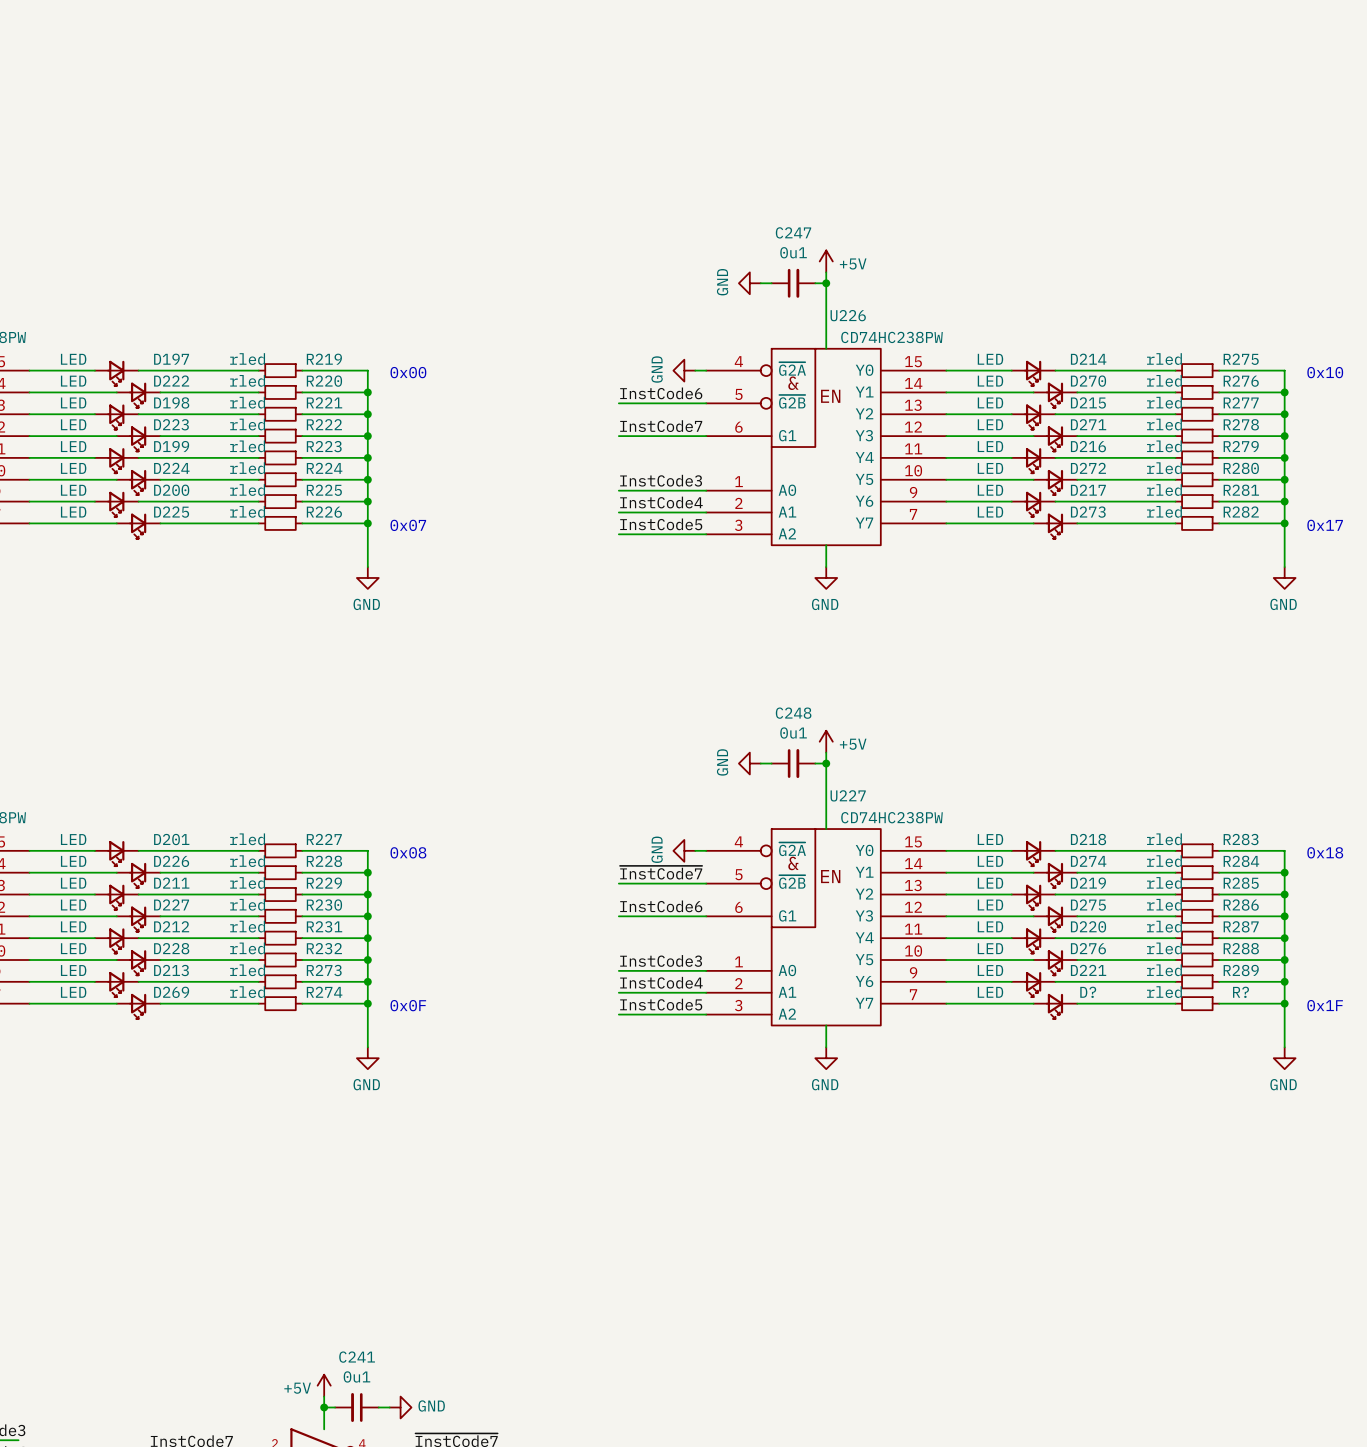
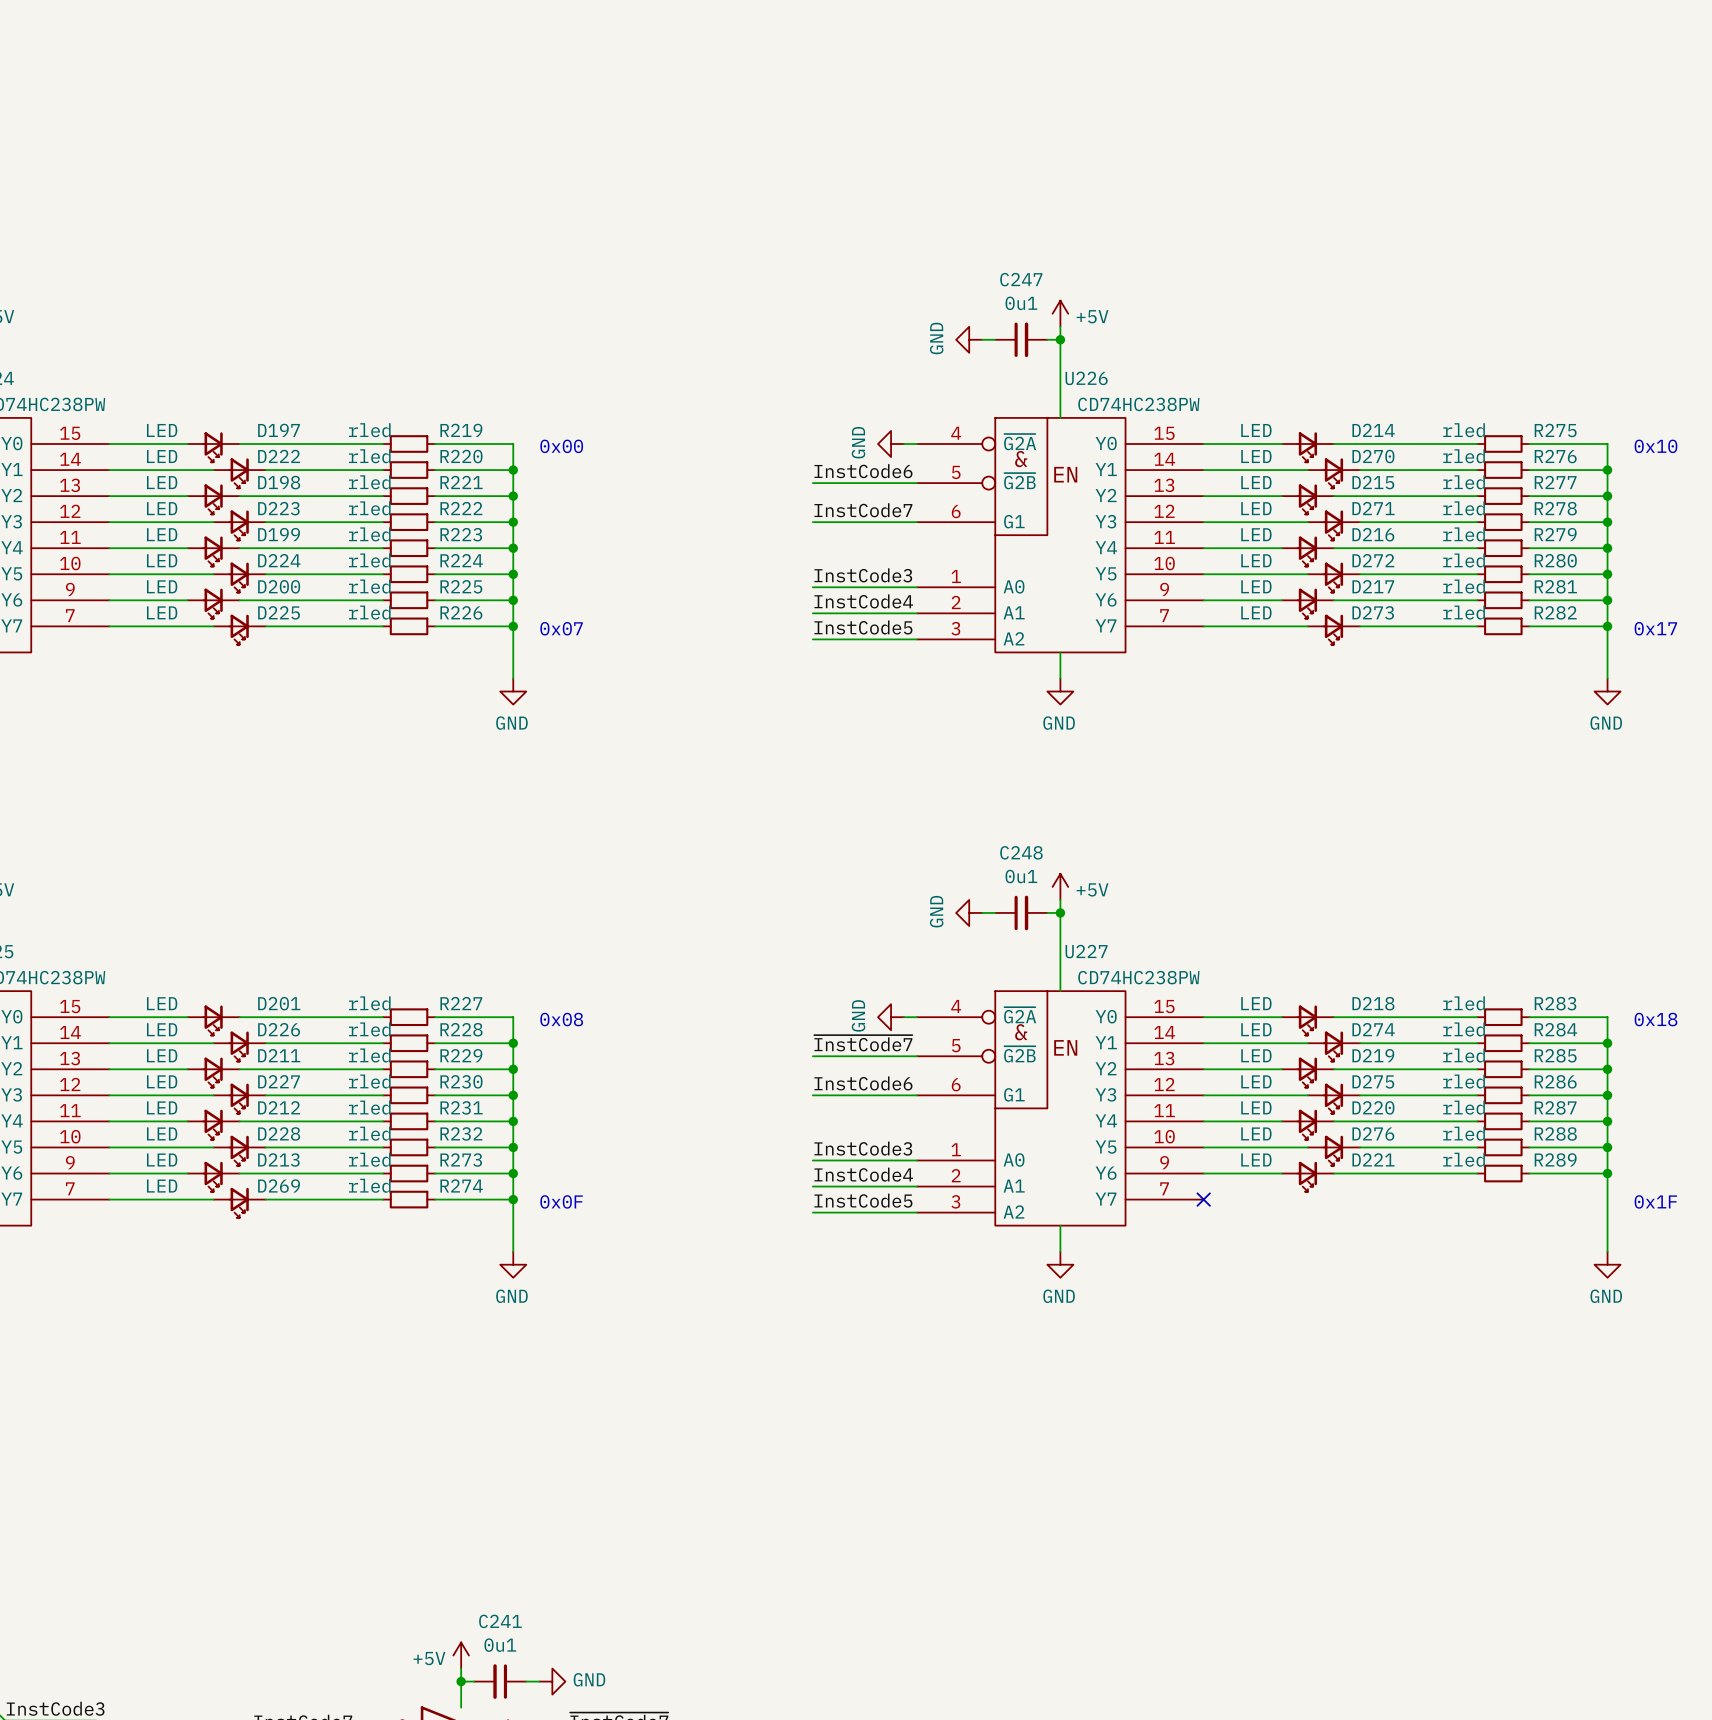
wire: (946, 1003) (1033, 1003) -> none
no-connect mark: none -> (1203, 1199)
wire: (1077, 1003) (1175, 1003) -> none
R?: rled (1197, 1003) -> none
wire: (1219, 1003) (1284, 1003) -> none
junction: (1284, 1003) -> none
D?: LED (1055, 1006) -> none

